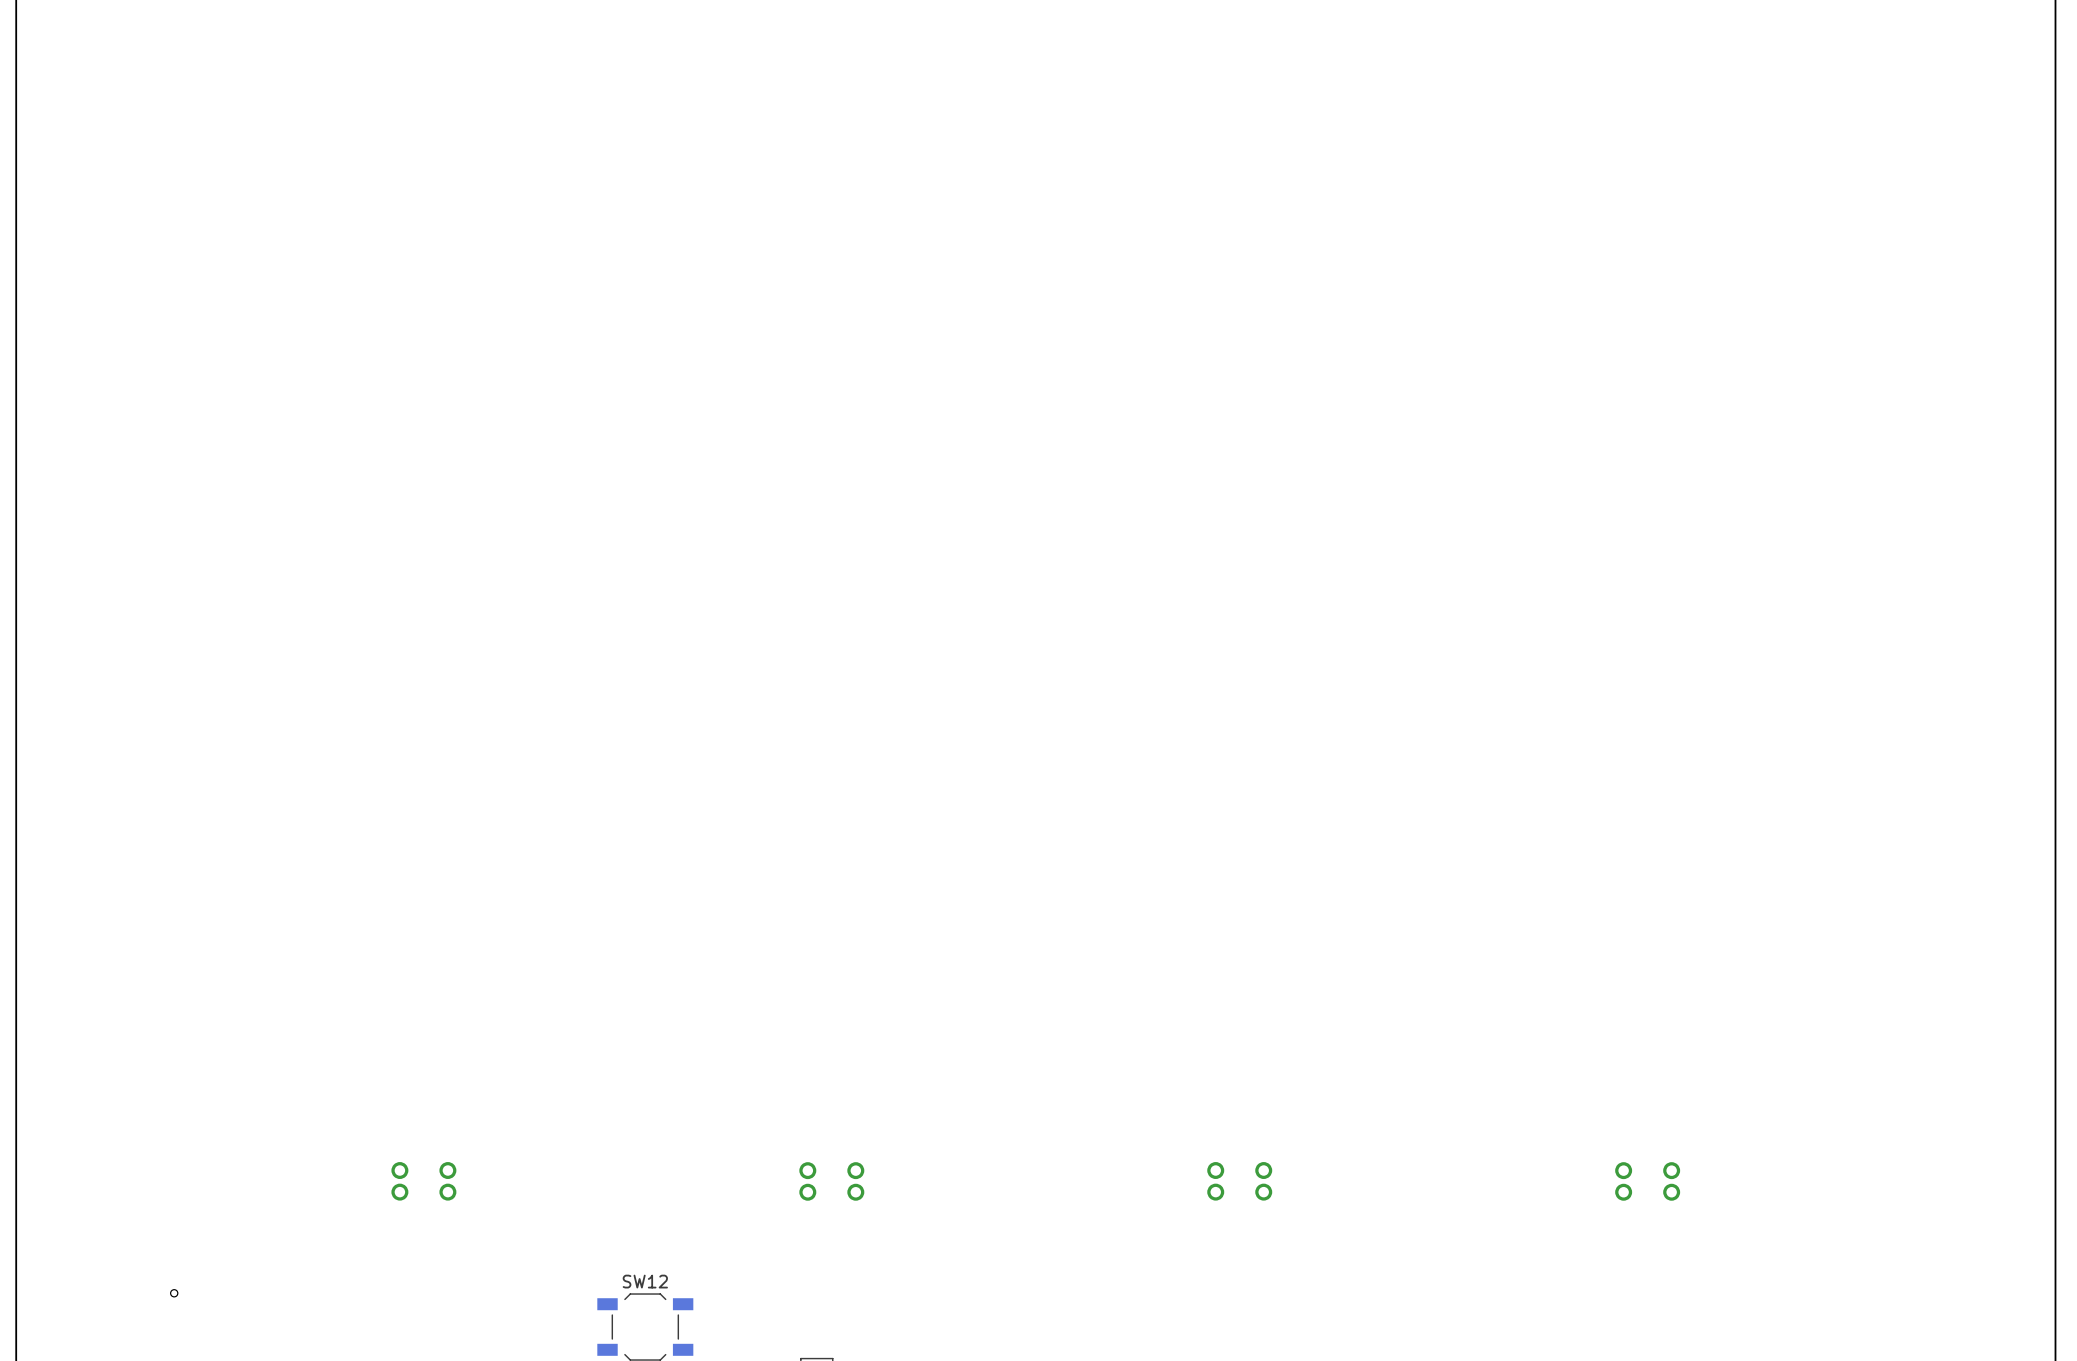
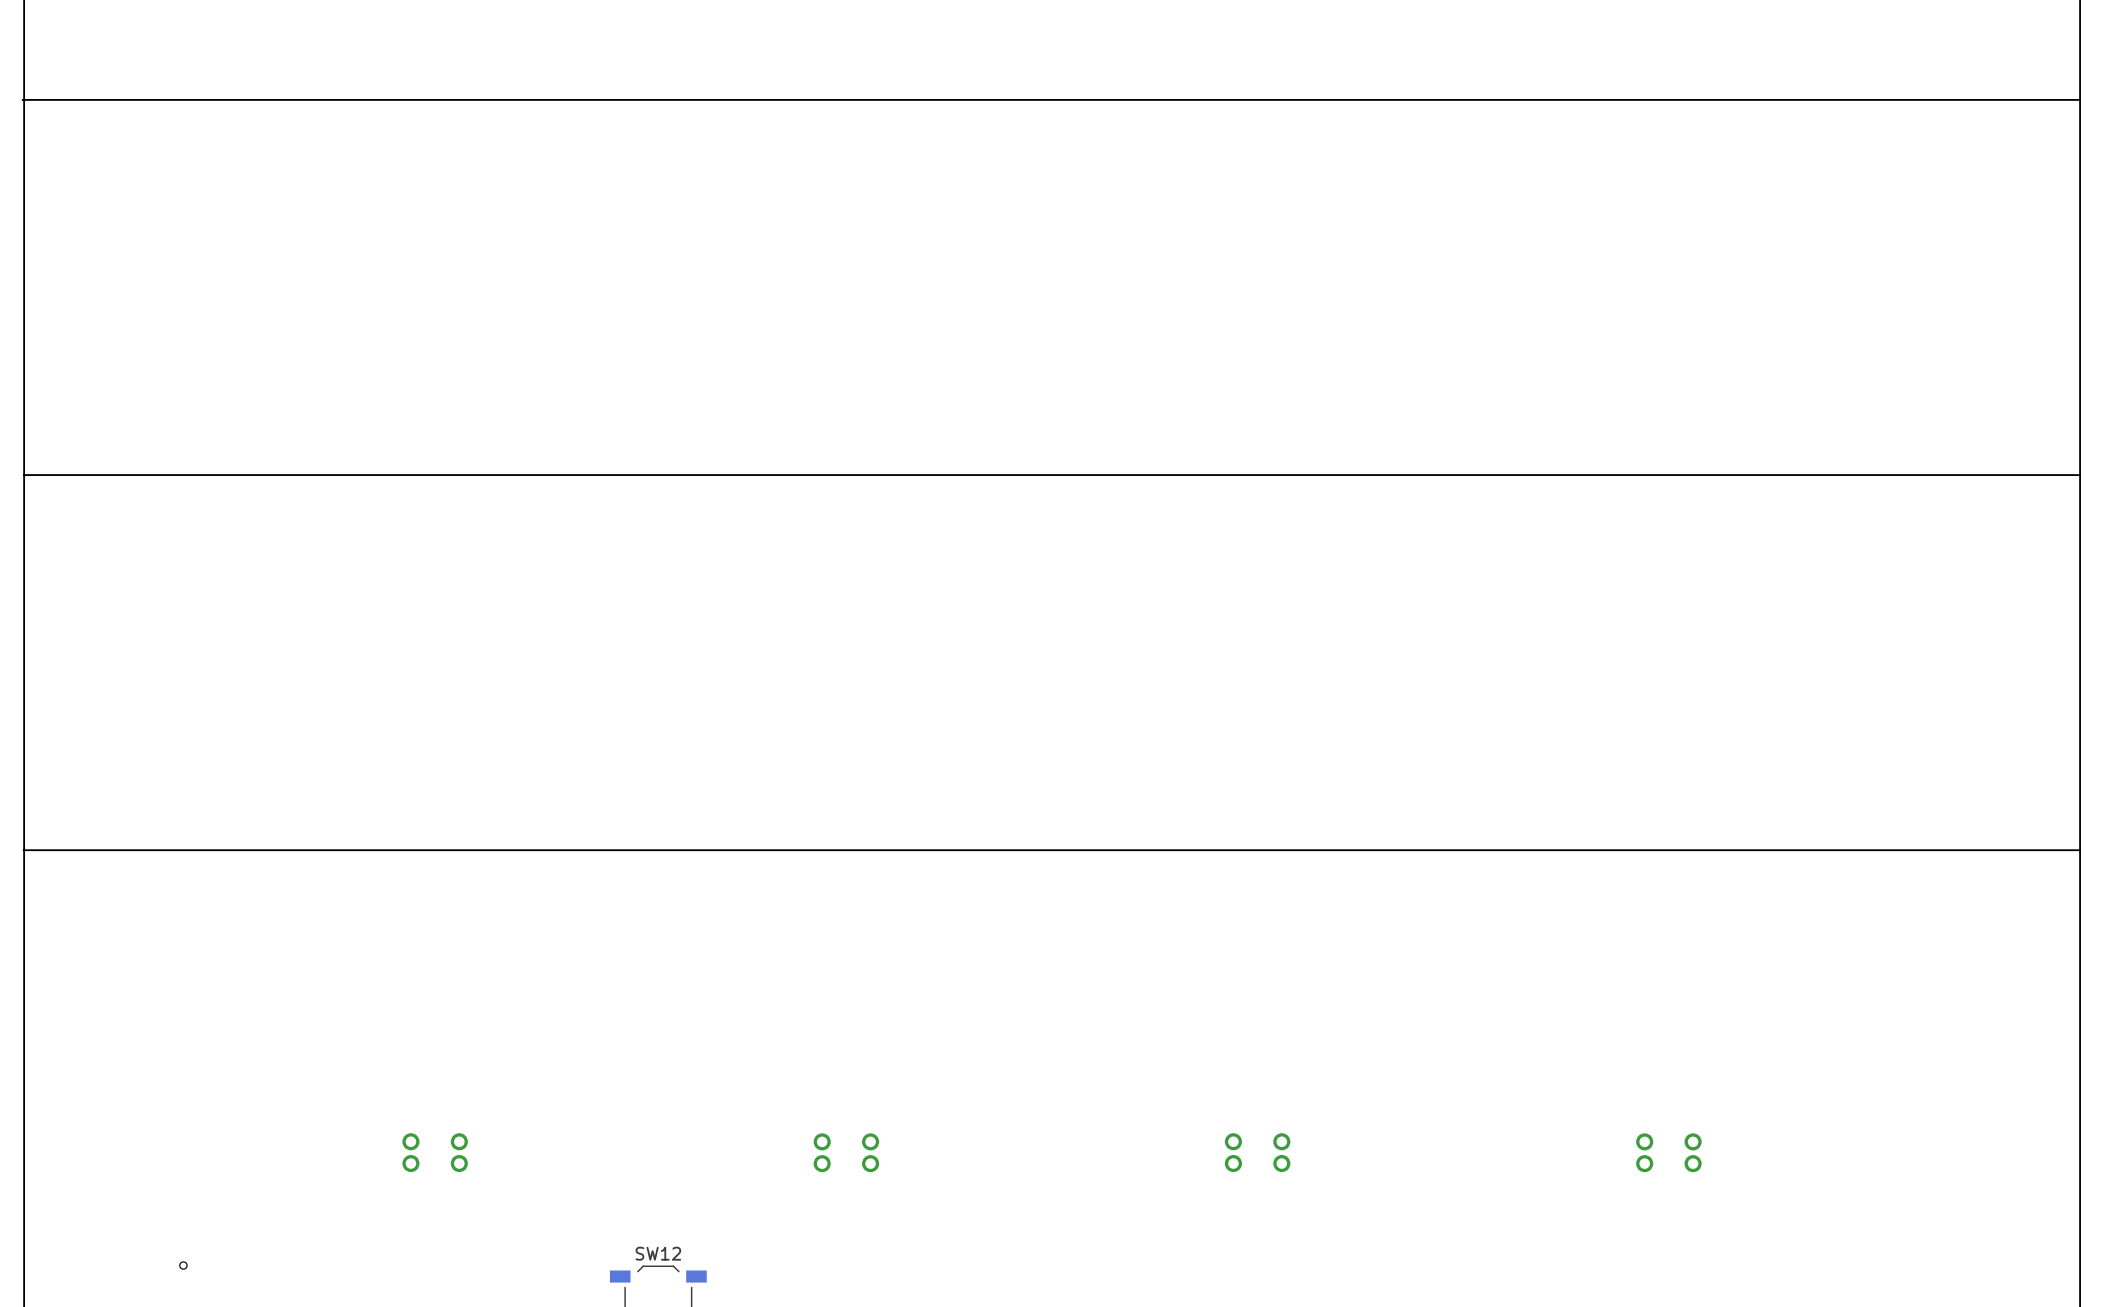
board edge: none -> (2078, 99) (22, 99)
board edge: none -> (2079, 475) (23, 475)
board edge: none -> (2079, 850) (23, 850)

